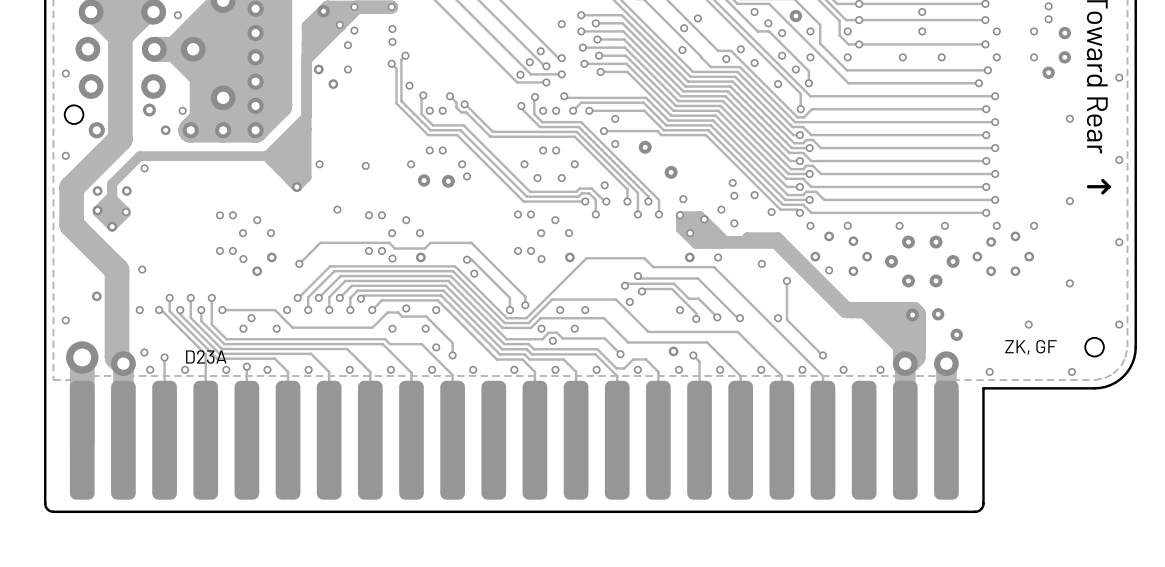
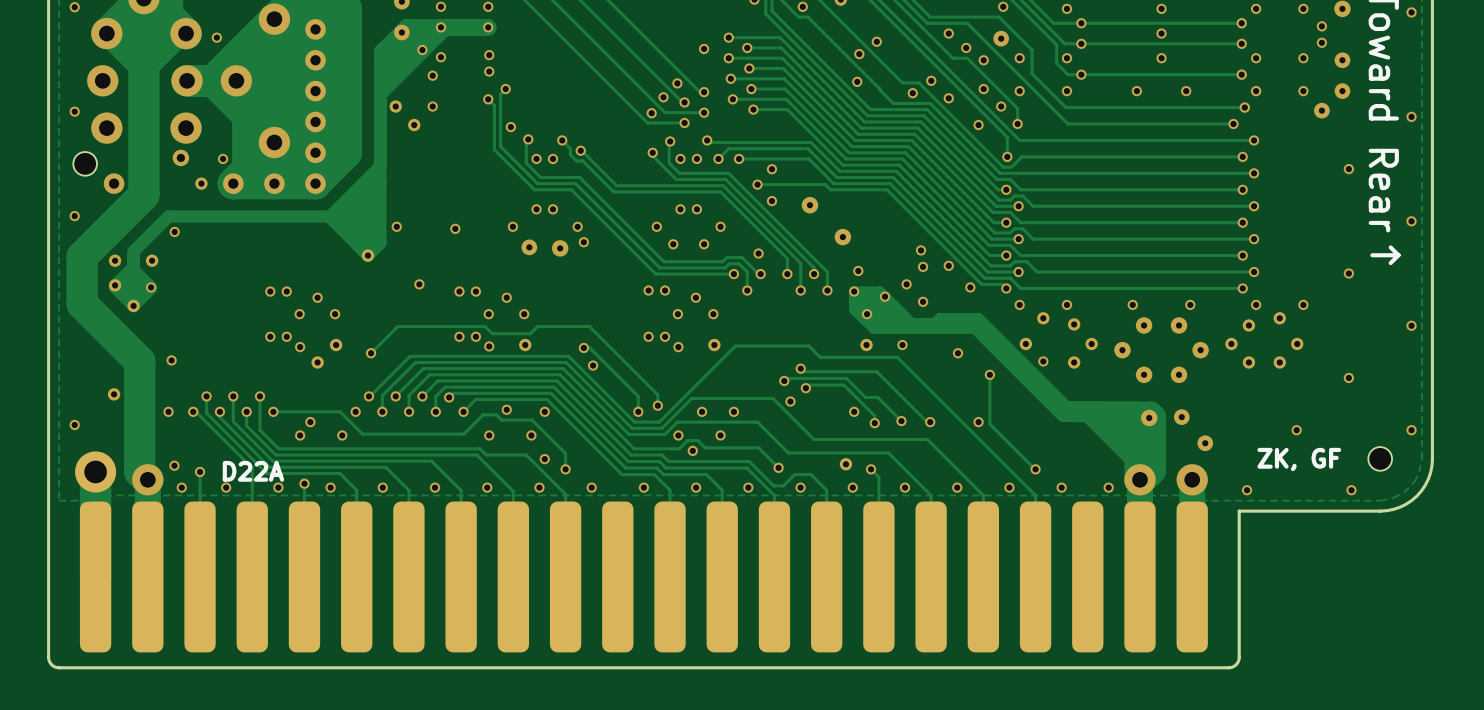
text: D23A (206, 356) -> D22A (253, 471)

